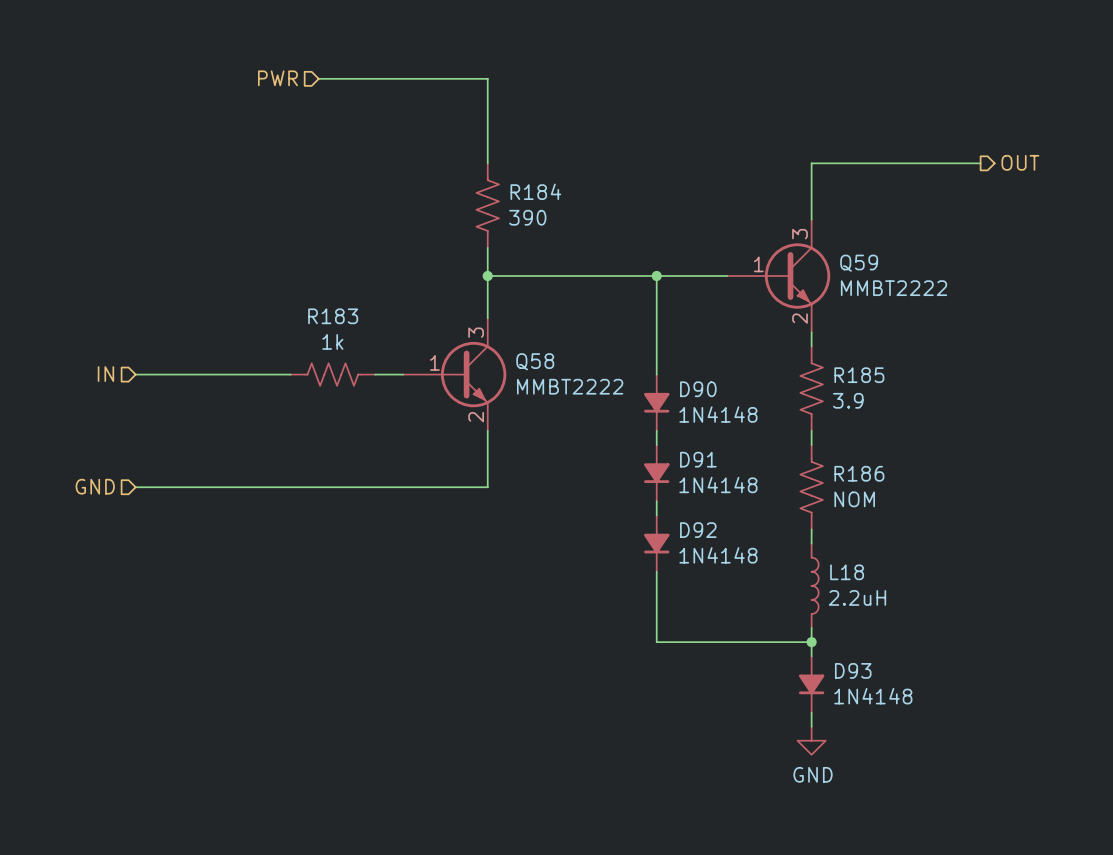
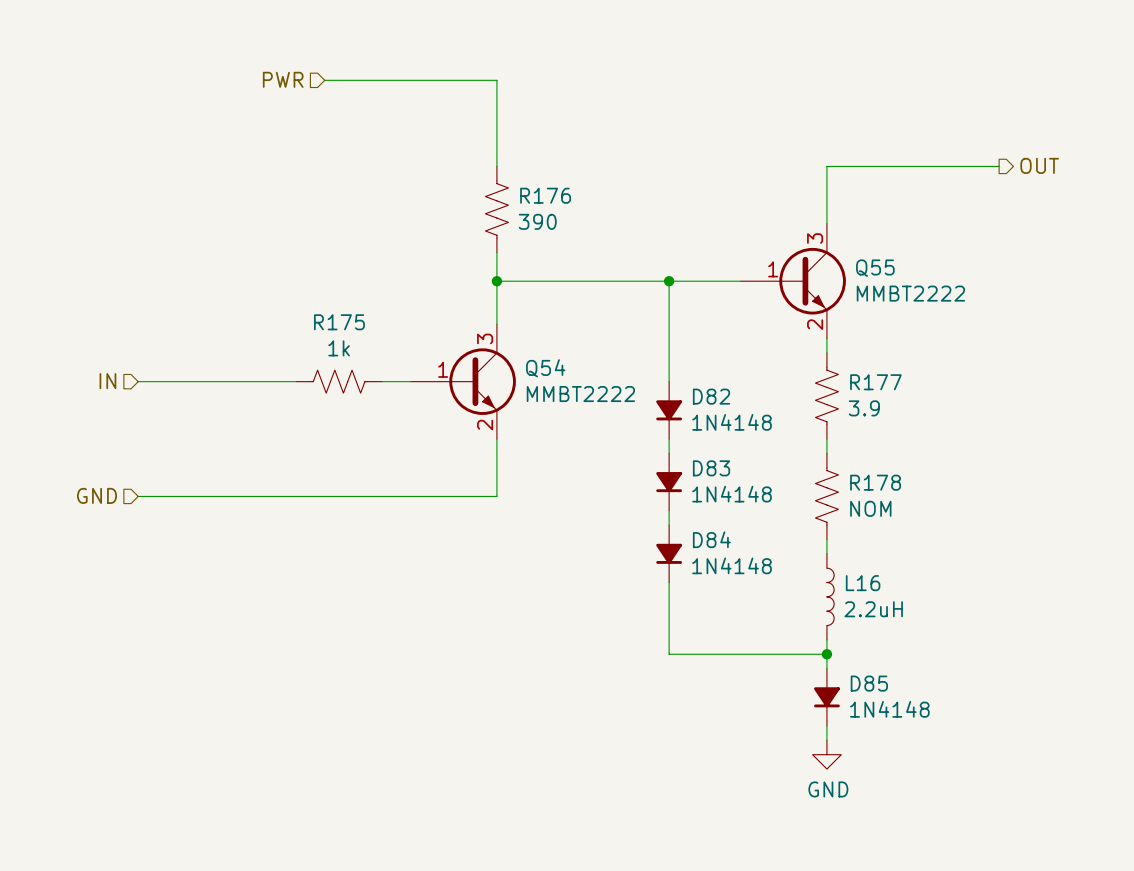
R184 name: R184 (535, 191) -> R176 (545, 195)
Q59 name: Q59 (859, 263) -> Q55 (875, 268)
R183 name: R183 (333, 316) -> R175 (339, 322)
Q58 name: Q58 (535, 361) -> Q54 (545, 368)
R185 name: R185 (859, 375) -> R177 (875, 382)
D90 name: D90 (698, 389) -> D82 (711, 396)
D91 name: D91 (698, 459) -> D83 (711, 468)
R186 name: R186 (859, 473) -> R178 (875, 482)
D92 name: D92 (698, 530) -> D84 (711, 539)
L18 name: L18 (847, 572) -> L16 (863, 583)
D93 name: D93 (853, 670) -> D85 (869, 683)

